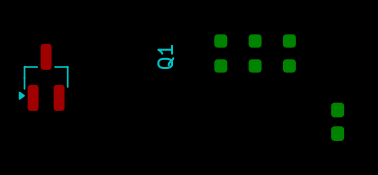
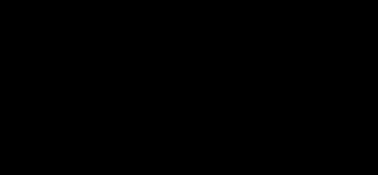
part: (220, 53) -> none
part: (255, 53) -> none
part: (289, 53) -> none
Q1: (43, 77) -> none
part: (337, 121) -> none

